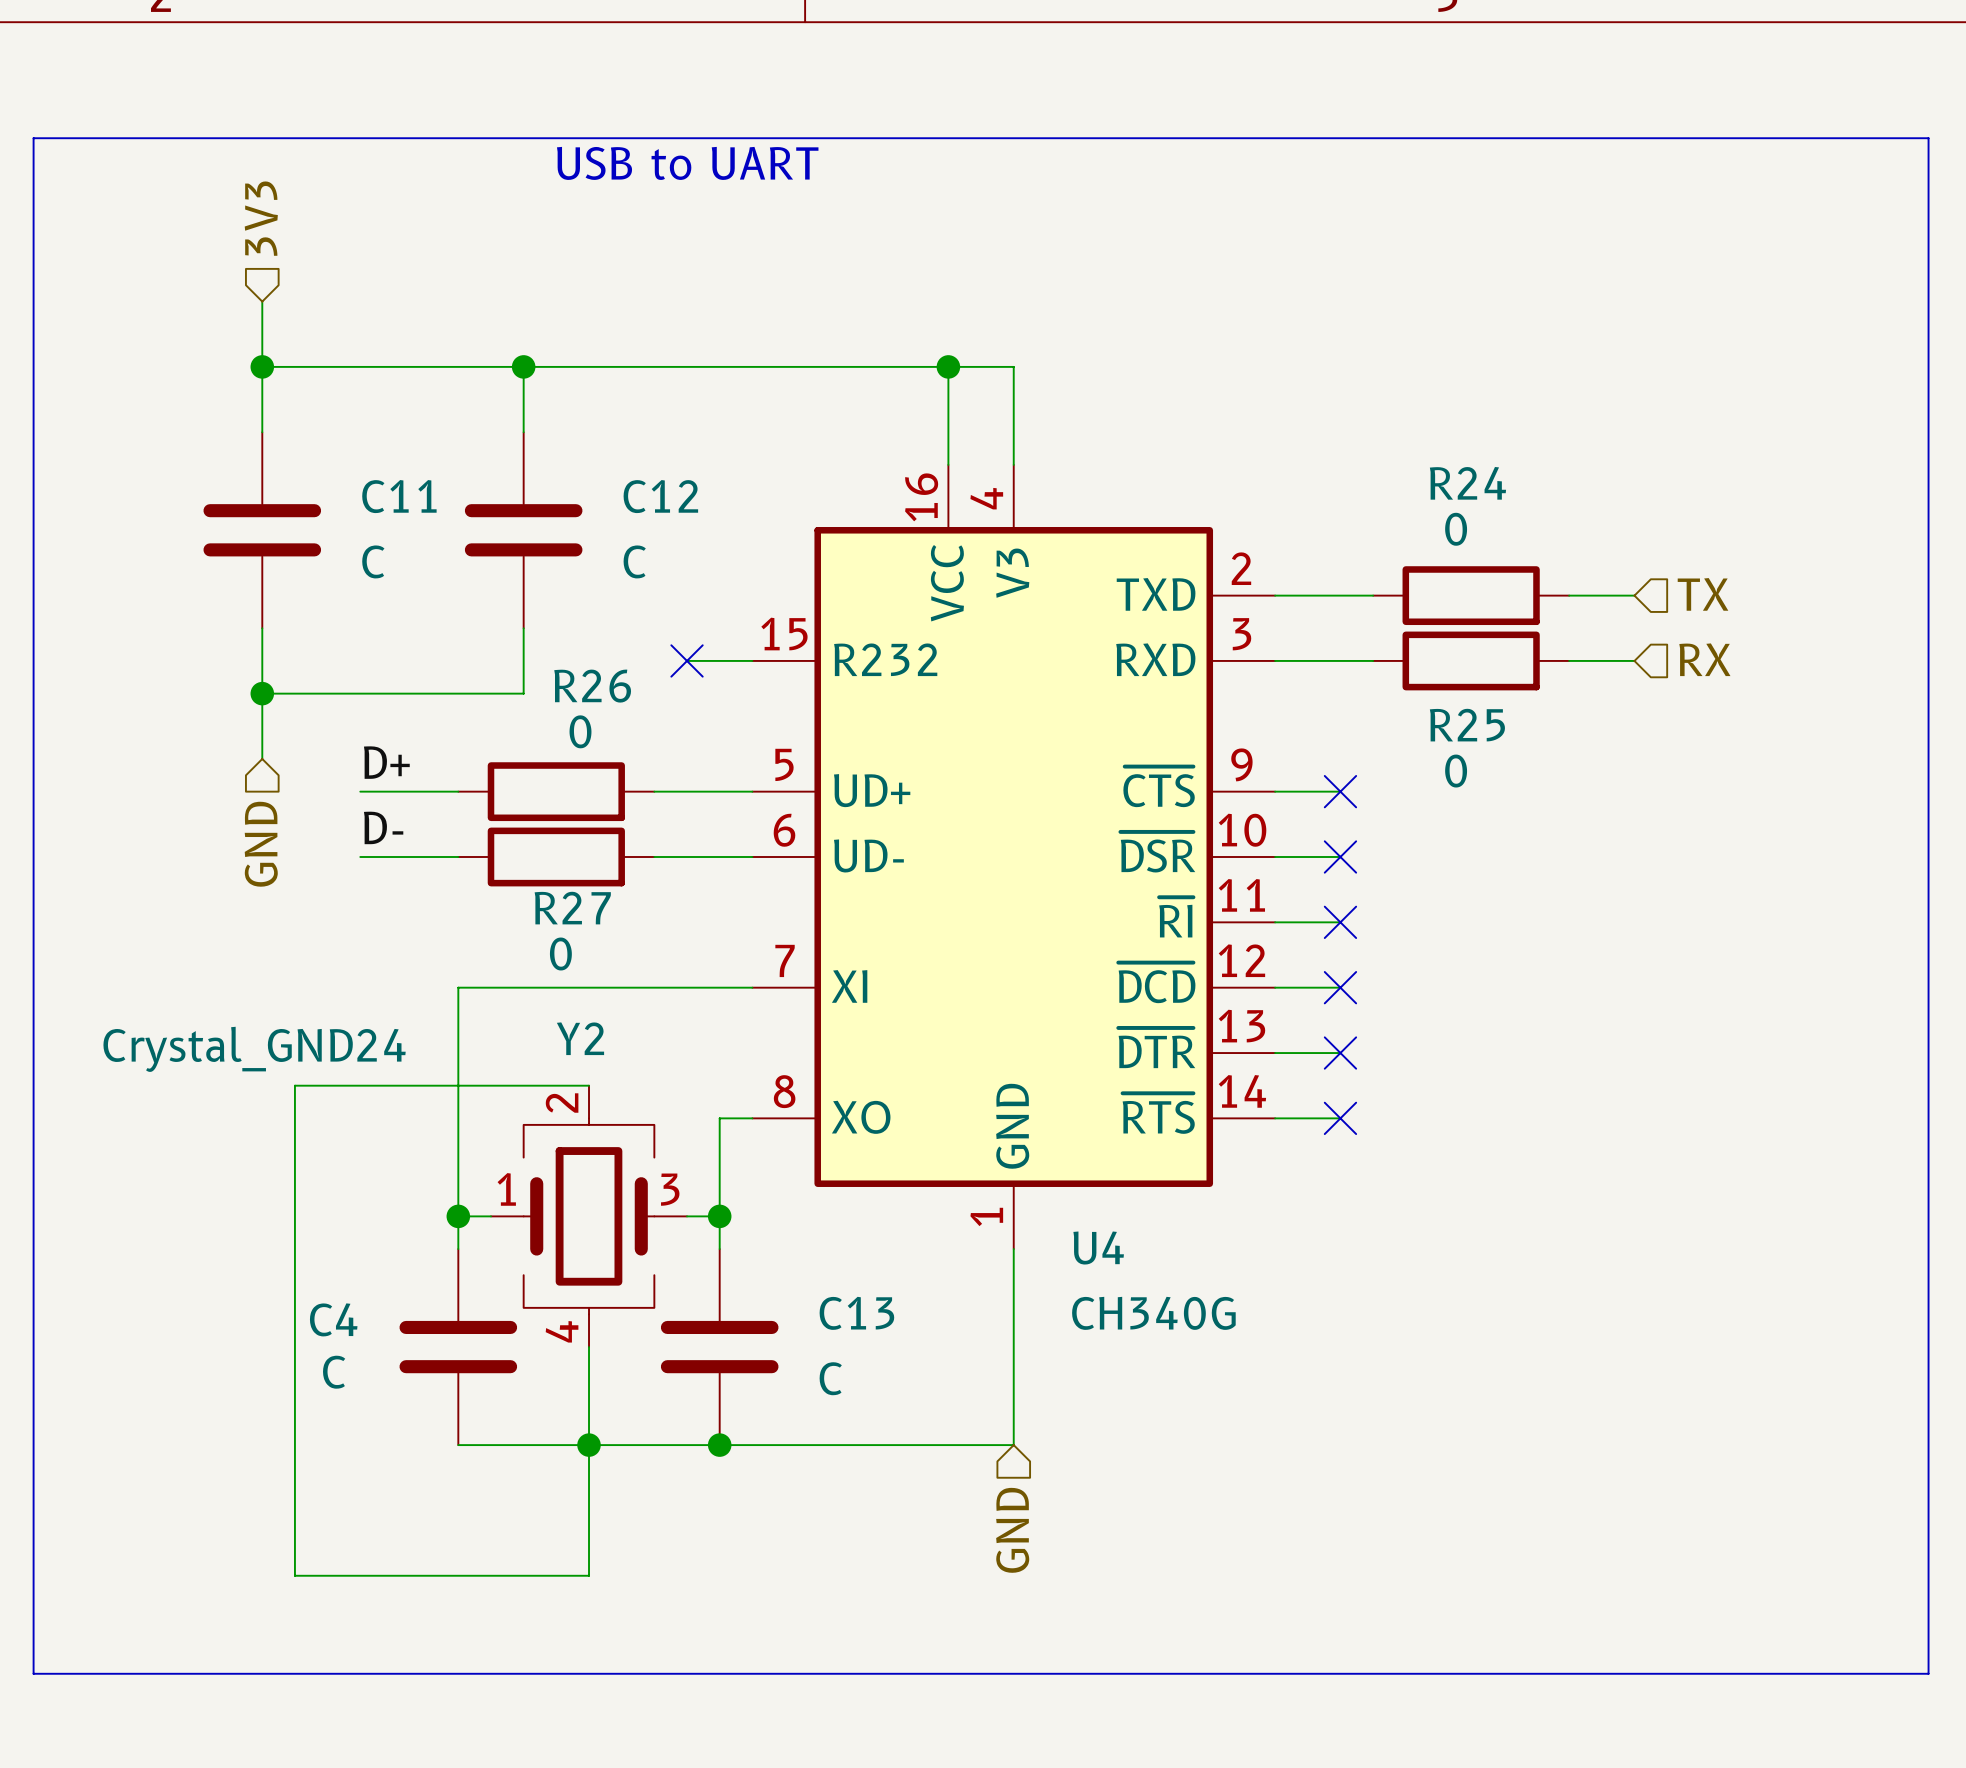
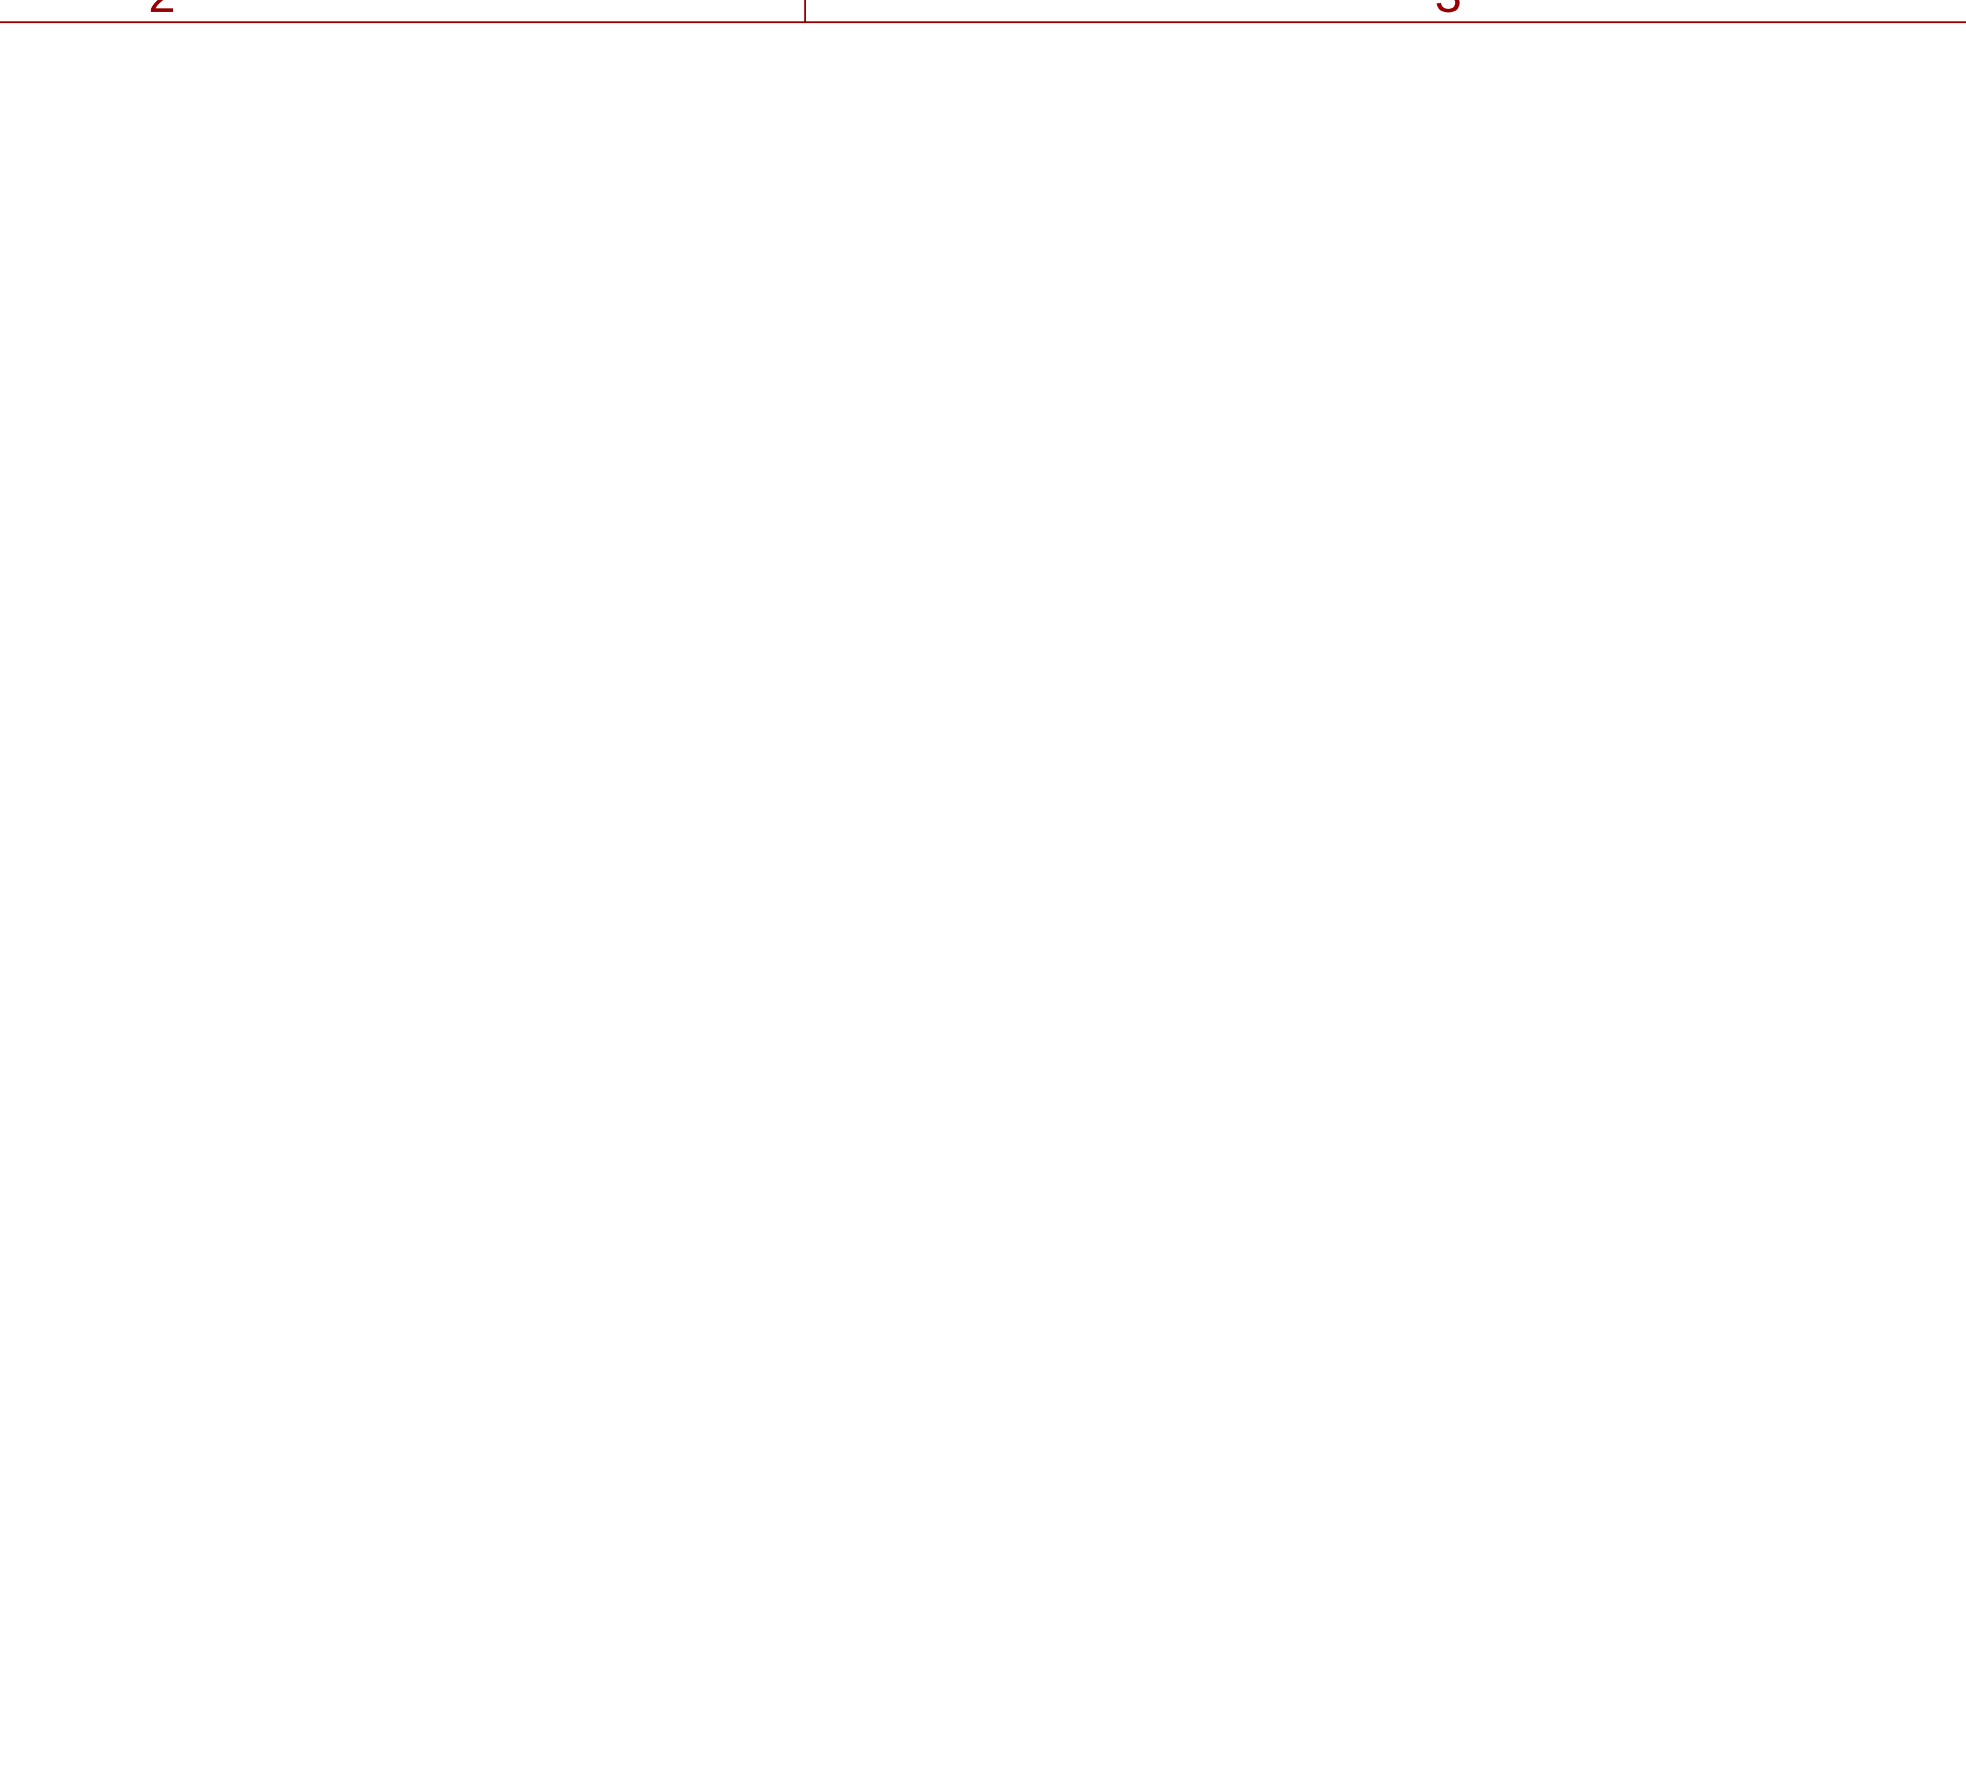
line: (33, 138) (1928, 138) (1928, 1673) (33, 1673) (33, 138) -> none
text: USB to UART (687, 163) -> none
hierarchical label: 3V3 (261, 218) -> none
wire: (262, 301) (262, 432) -> none
wire: (262, 366) (1013, 366) (1013, 464) -> none
junction: (262, 366) -> none
wire: (523, 366) (523, 432) -> none
junction: (523, 366) -> none
wire: (948, 366) (948, 464) -> none
junction: (948, 366) -> none
C11: C (262, 530) -> none
C12: C (523, 530) -> none
hierarchical label: TX (1703, 594) -> none
wire: (1275, 595) (1373, 595) -> none
R24: 0 (1471, 595) -> none
wire: (1569, 595) (1634, 595) -> none
wire: (262, 628) (262, 758) -> none
wire: (523, 628) (523, 693) (262, 693) -> none
hierarchical label: RX (1704, 659) -> none
wire: (687, 660) (752, 660) -> none
no-connect mark: (687, 660) -> none
wire: (1275, 660) (1373, 660) -> none
R25: 0 (1471, 660) -> none
wire: (1569, 660) (1634, 660) -> none
junction: (262, 693) -> none
label: D+ (386, 762) -> none
wire: (360, 791) (458, 791) -> none
R26: 0 (556, 791) -> none
wire: (654, 791) (752, 791) -> none
wire: (1275, 791) (1340, 791) -> none
no-connect mark: (1340, 791) -> none
label: D- (383, 827) -> none
hierarchical label: GND (261, 844) -> none
wire: (360, 856) (458, 856) -> none
R27: 0 (556, 856) -> none
wire: (654, 856) (752, 856) -> none
U4: CH340G (1013, 856) -> none
wire: (1275, 856) (1340, 856) -> none
no-connect mark: (1340, 856) -> none
wire: (1275, 922) (1340, 922) -> none
no-connect mark: (1340, 922) -> none
wire: (752, 987) (458, 987) (458, 1249) -> none
wire: (1275, 987) (1340, 987) -> none
no-connect mark: (1340, 987) -> none
wire: (1275, 1053) (1340, 1053) -> none
no-connect mark: (1340, 1053) -> none
wire: (589, 1085) (294, 1085) (294, 1575) (589, 1575) (589, 1347) -> none
wire: (752, 1118) (719, 1118) (719, 1249) -> none
wire: (1275, 1118) (1340, 1118) -> none
no-connect mark: (1340, 1118) -> none
wire: (458, 1216) (490, 1216) -> none
junction: (458, 1216) -> none
Y2: Crystal_GND24 (589, 1216) -> none
wire: (687, 1216) (719, 1216) -> none
junction: (719, 1216) -> none
wire: (1013, 1249) (1013, 1445) (458, 1445) -> none
C4: C (458, 1347) -> none
C13: C (719, 1347) -> none
junction: (589, 1445) -> none
junction: (719, 1445) -> none
hierarchical label: GND (1012, 1530) -> none

